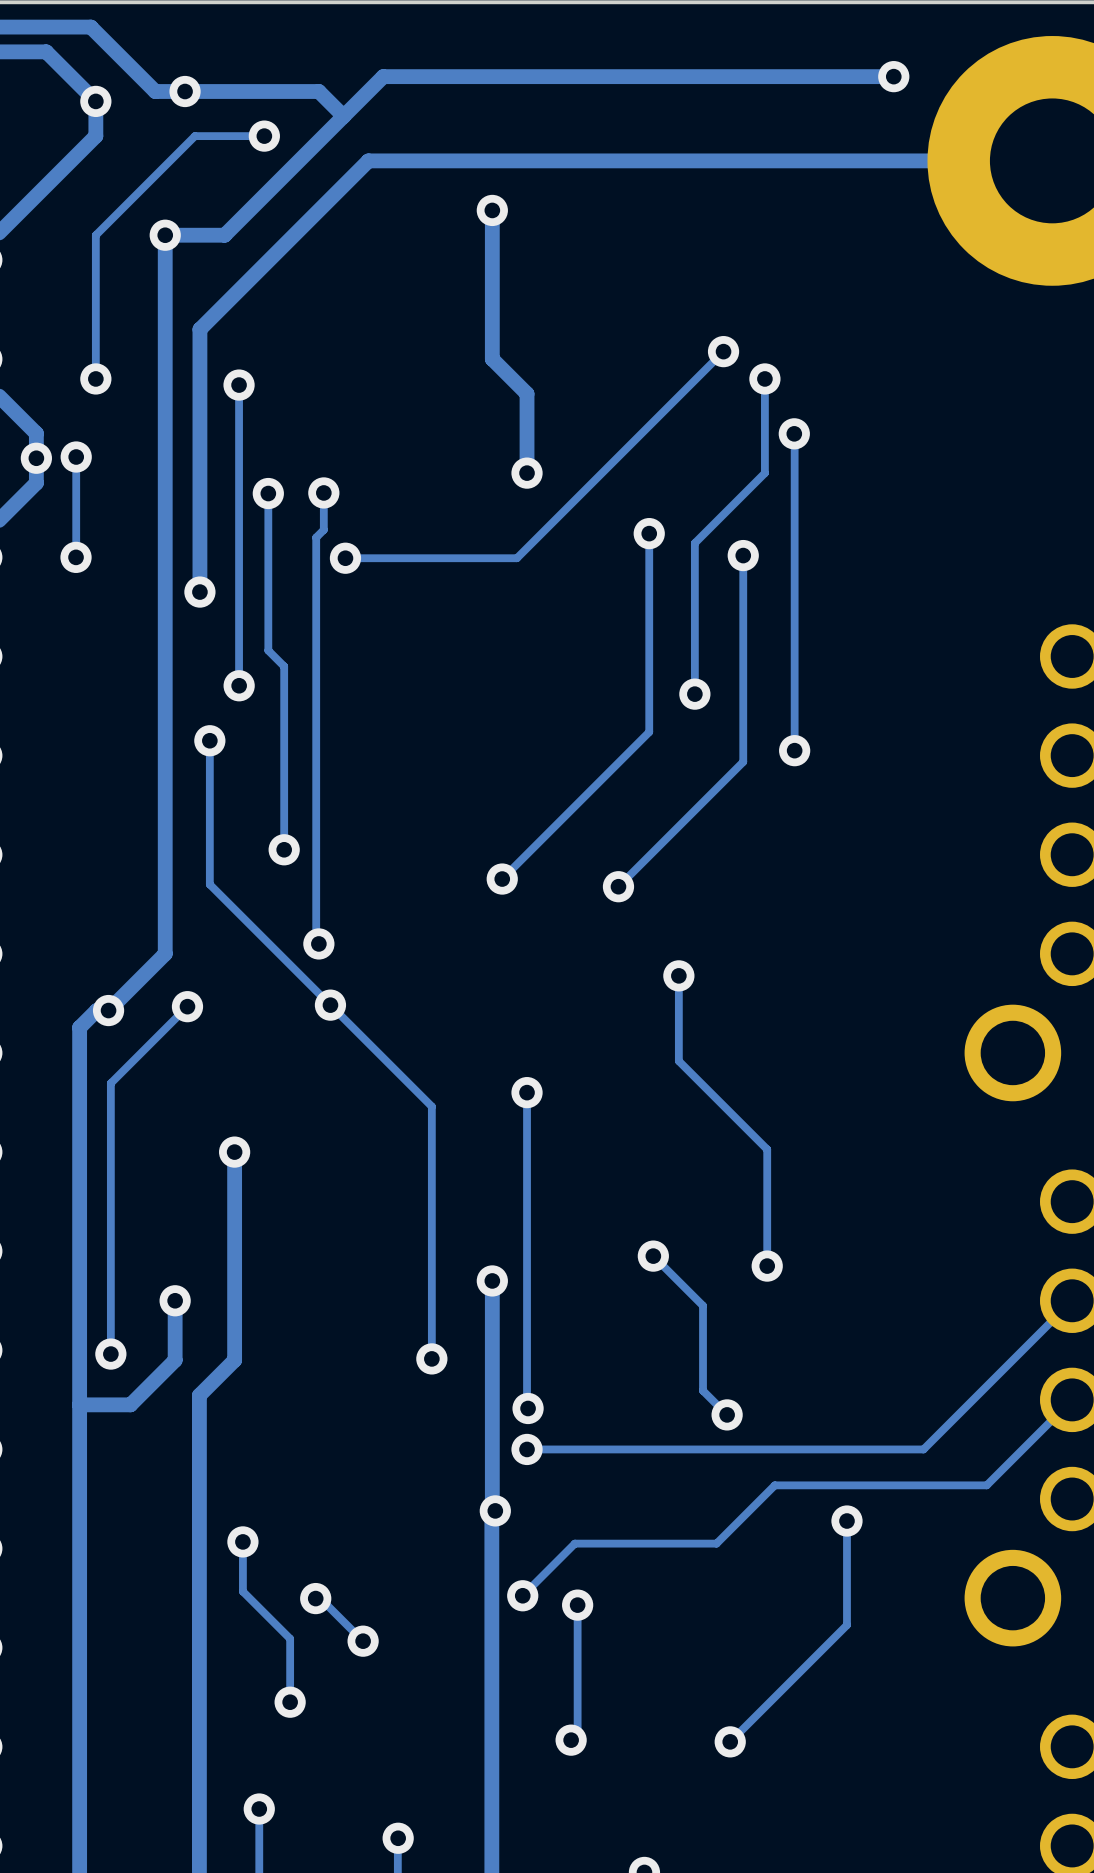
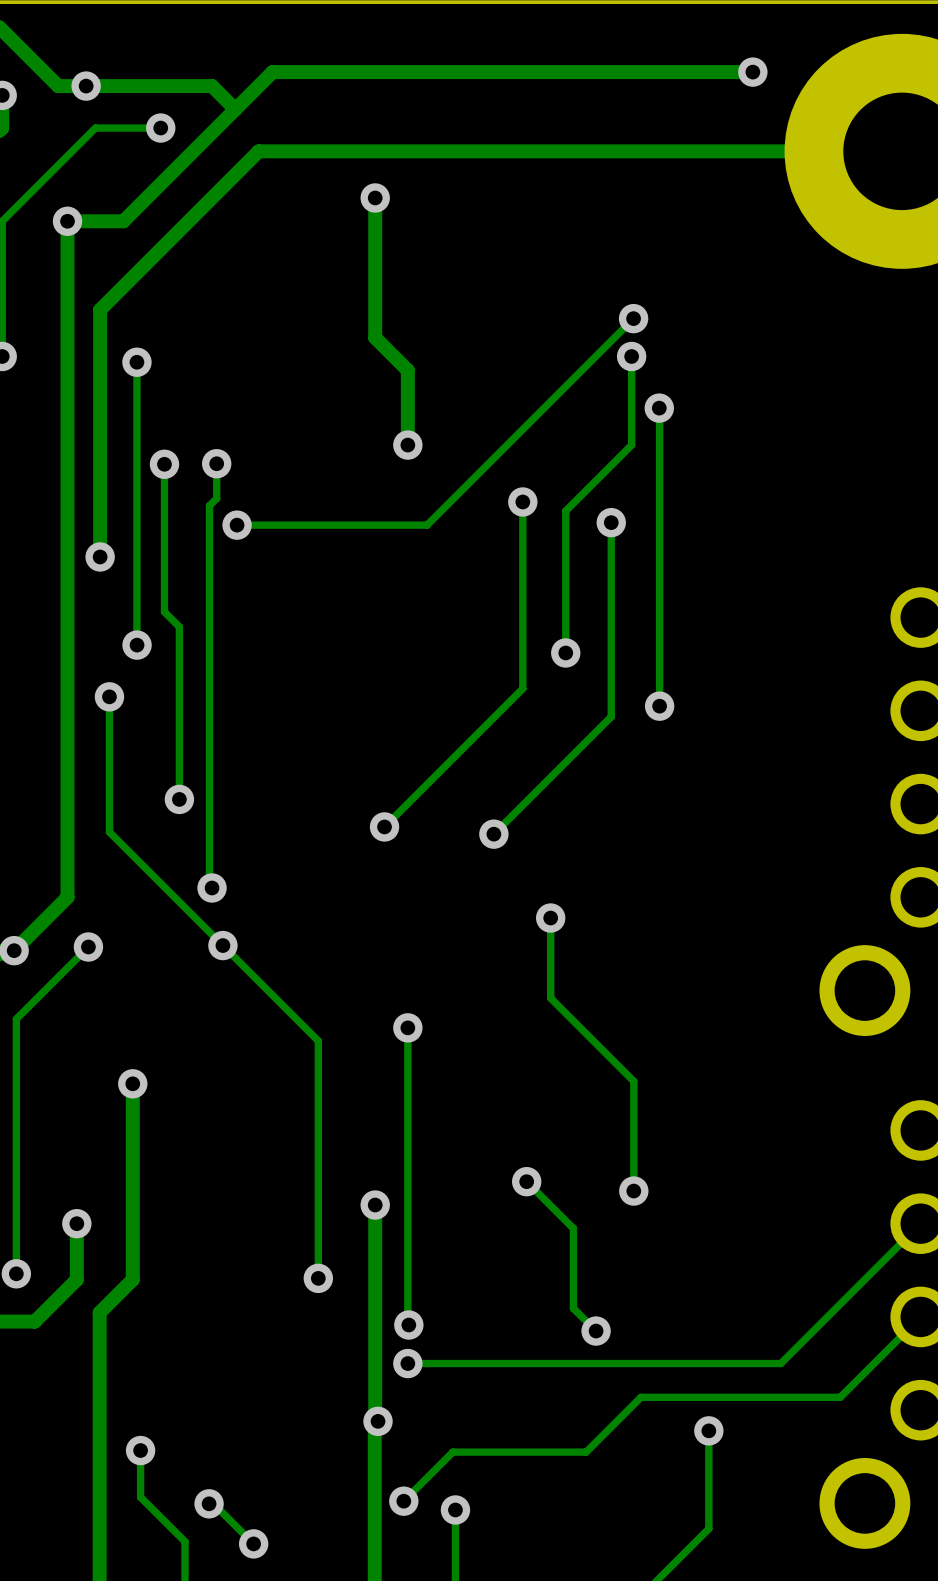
track: (723, 351) (516, 558) -> (633, 318) (427, 525) (398, 525)
via position: (723, 351) -> (633, 318)

